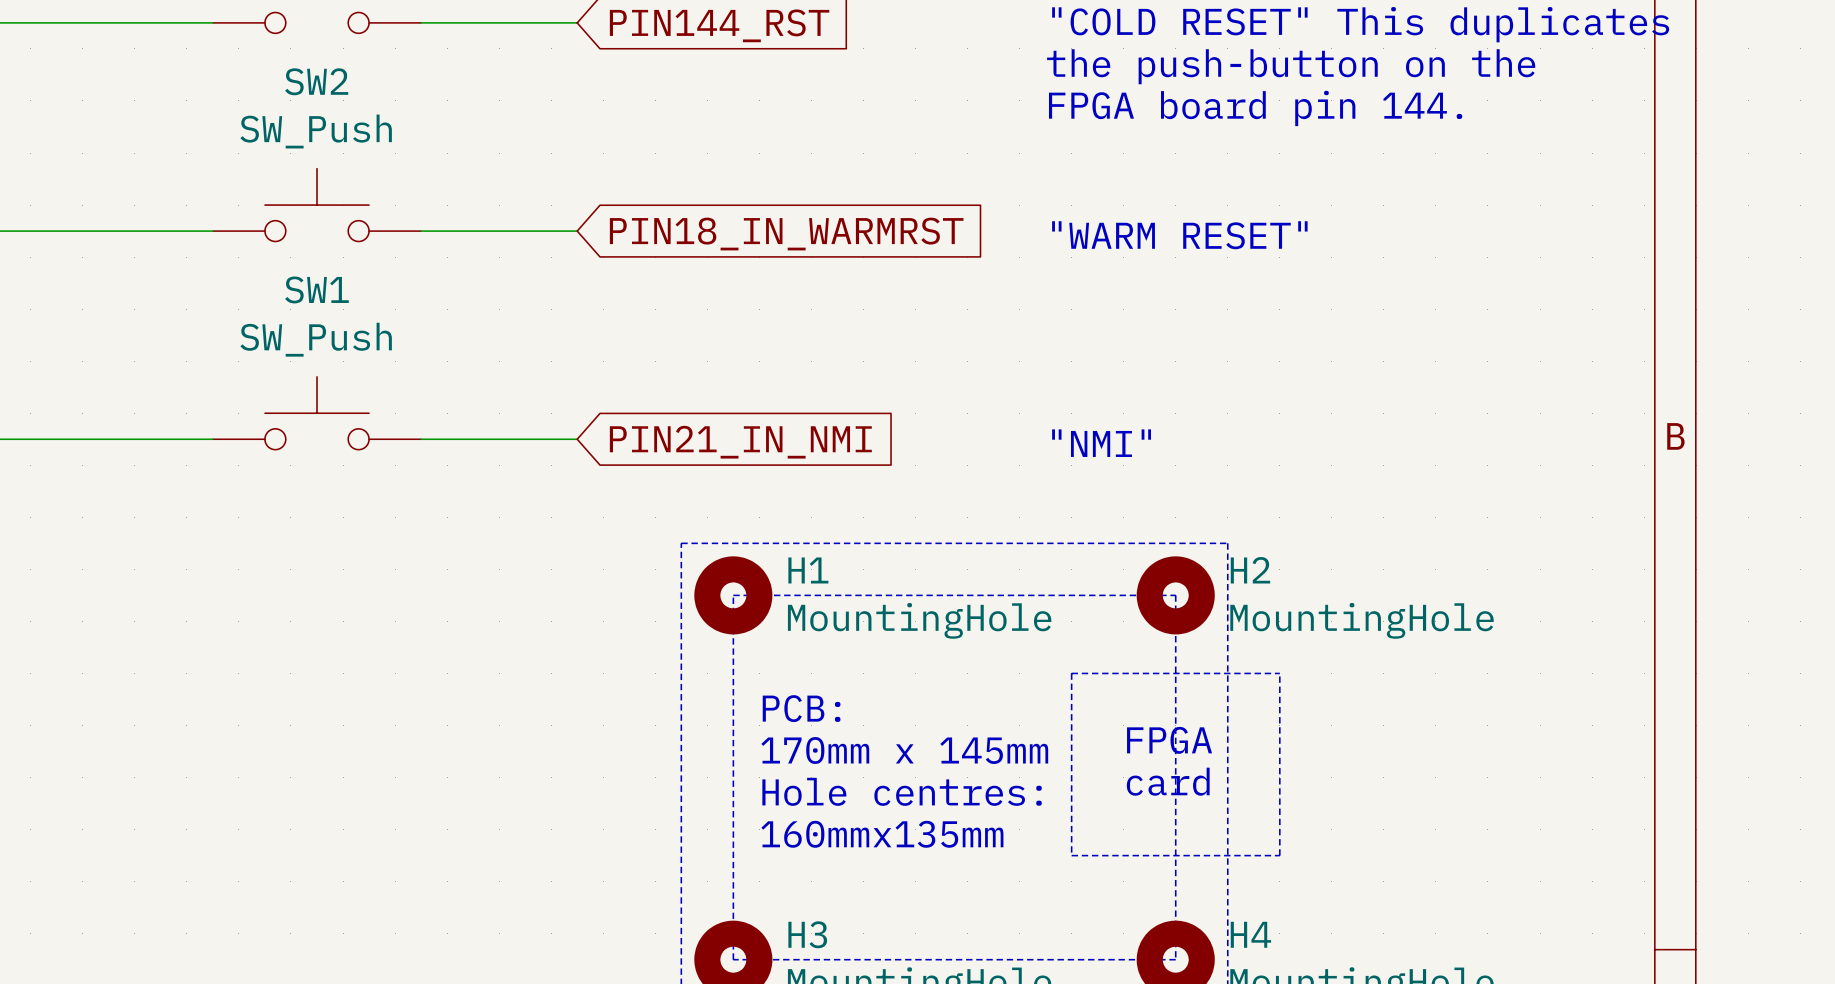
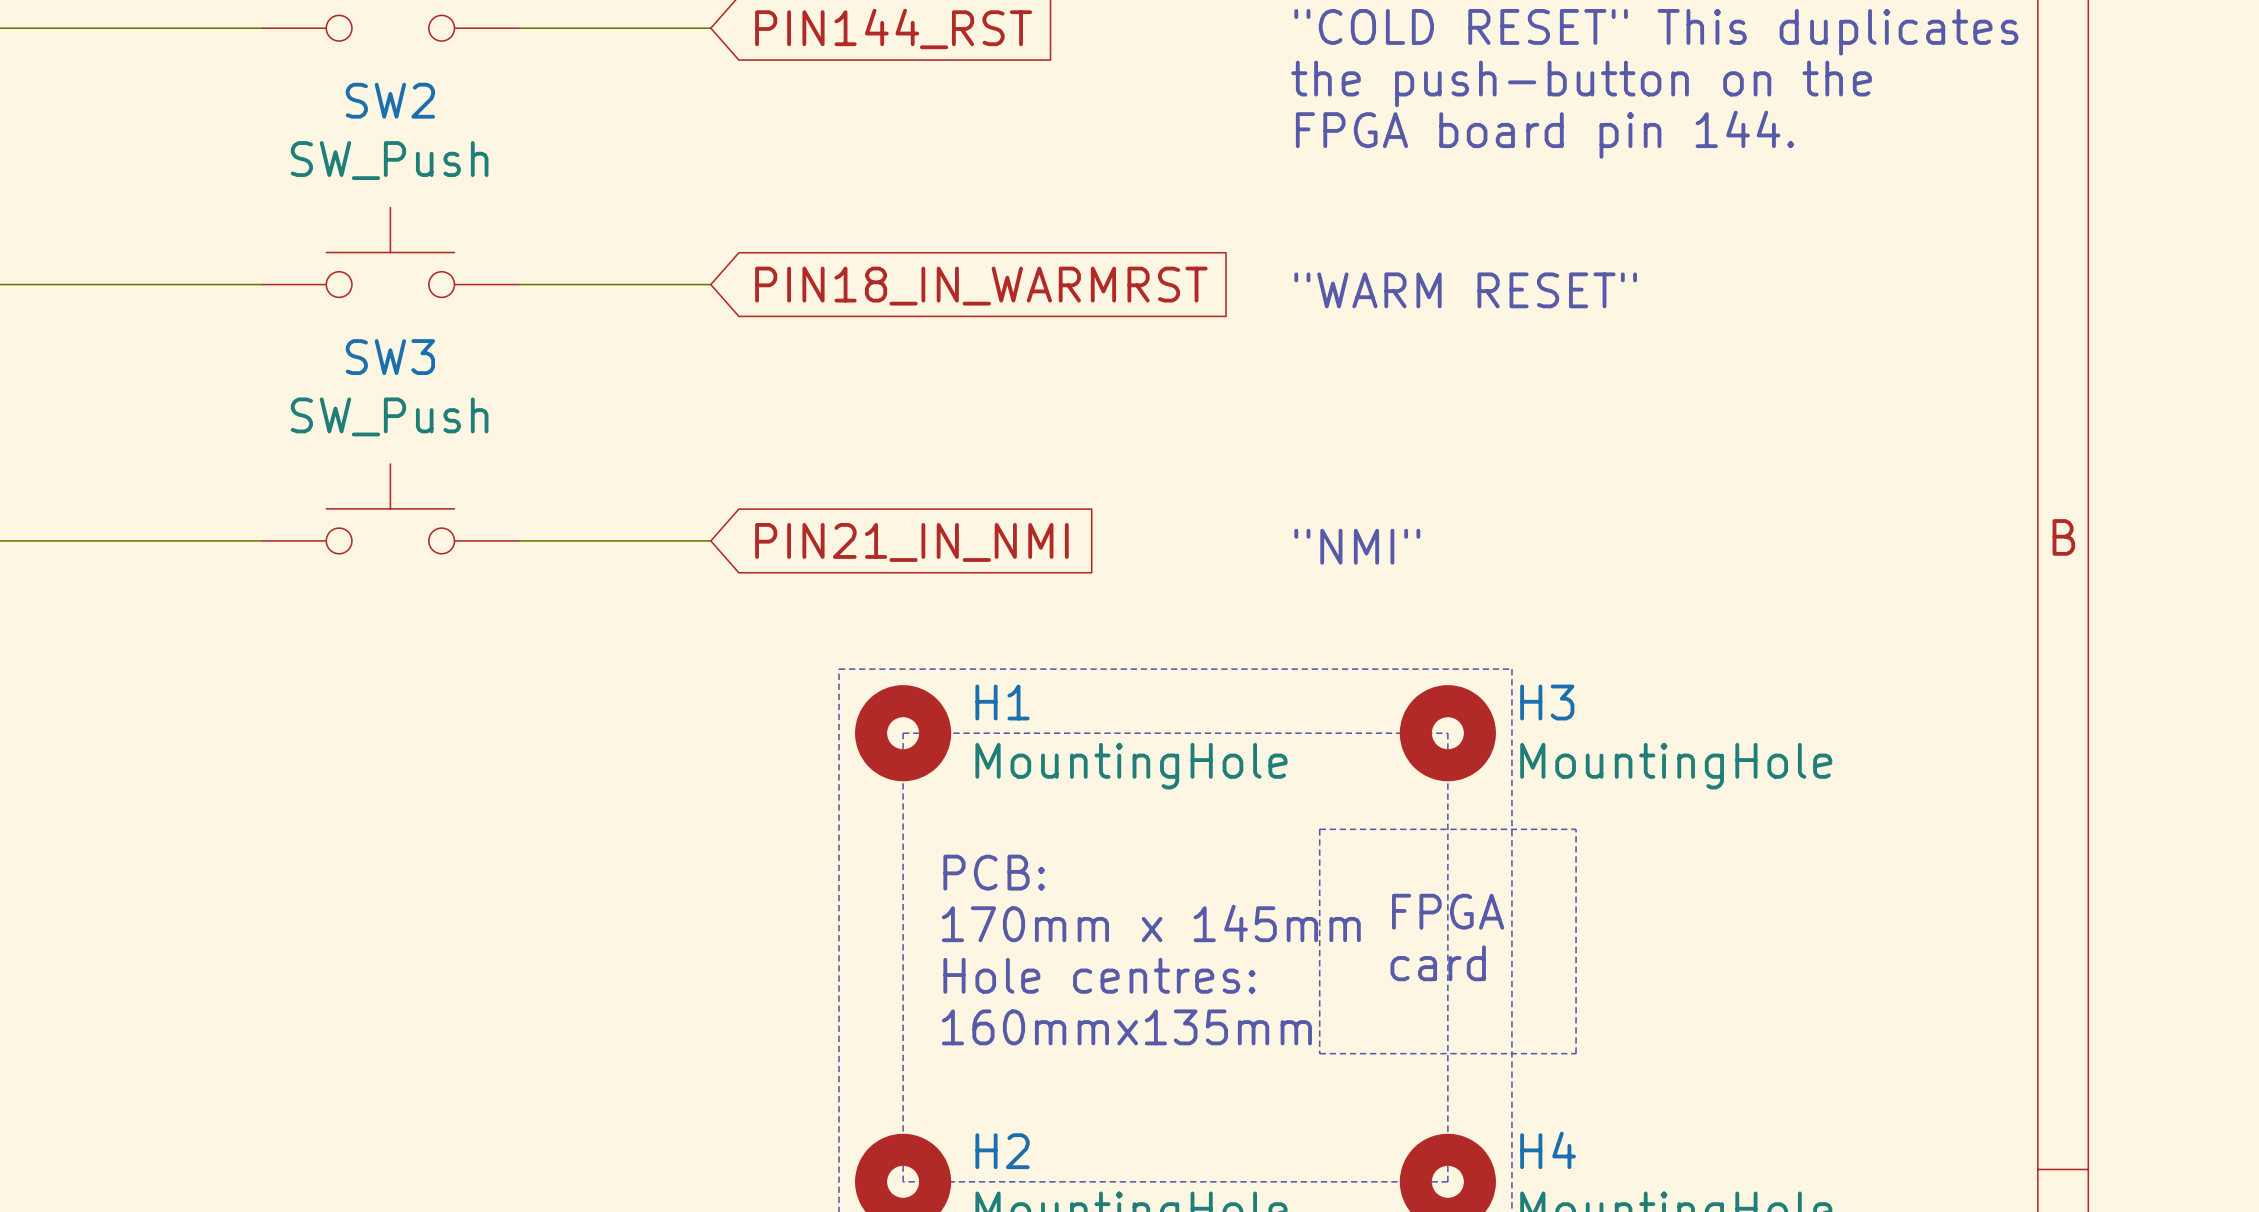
SW1 name: SW1 (316, 289) -> SW3 (390, 357)
H2 name: H2 (1250, 570) -> H3 (1547, 702)
H3 name: H3 (807, 934) -> H2 (1002, 1151)

